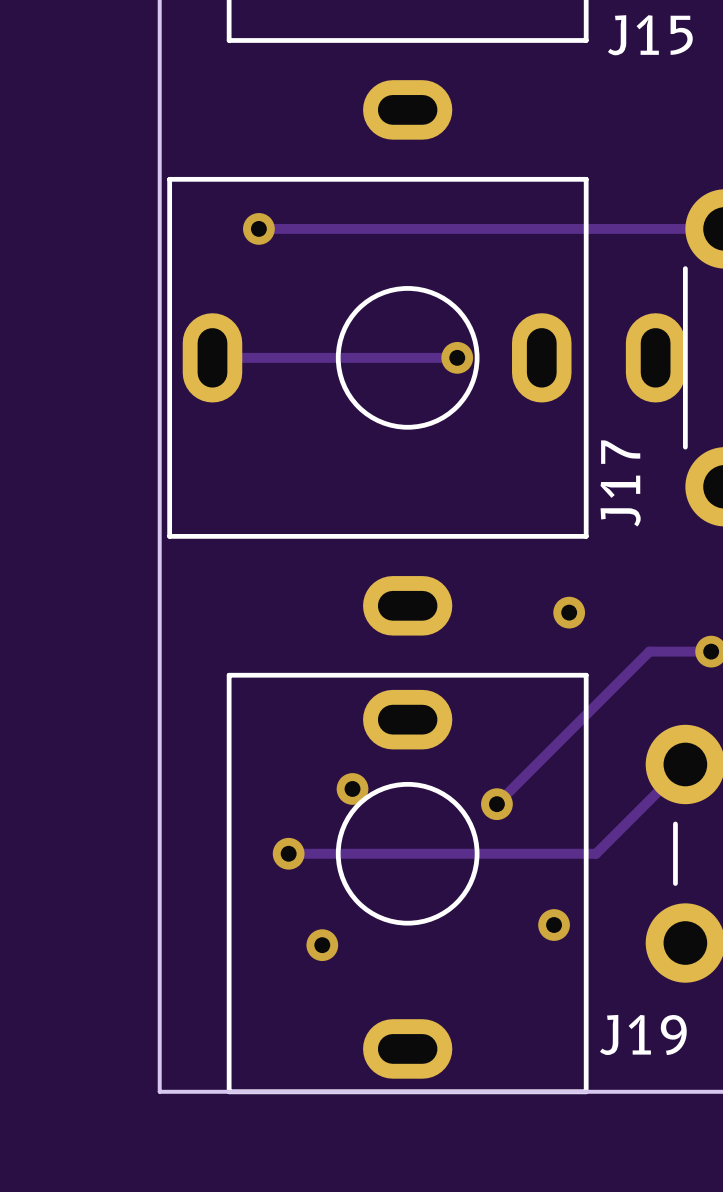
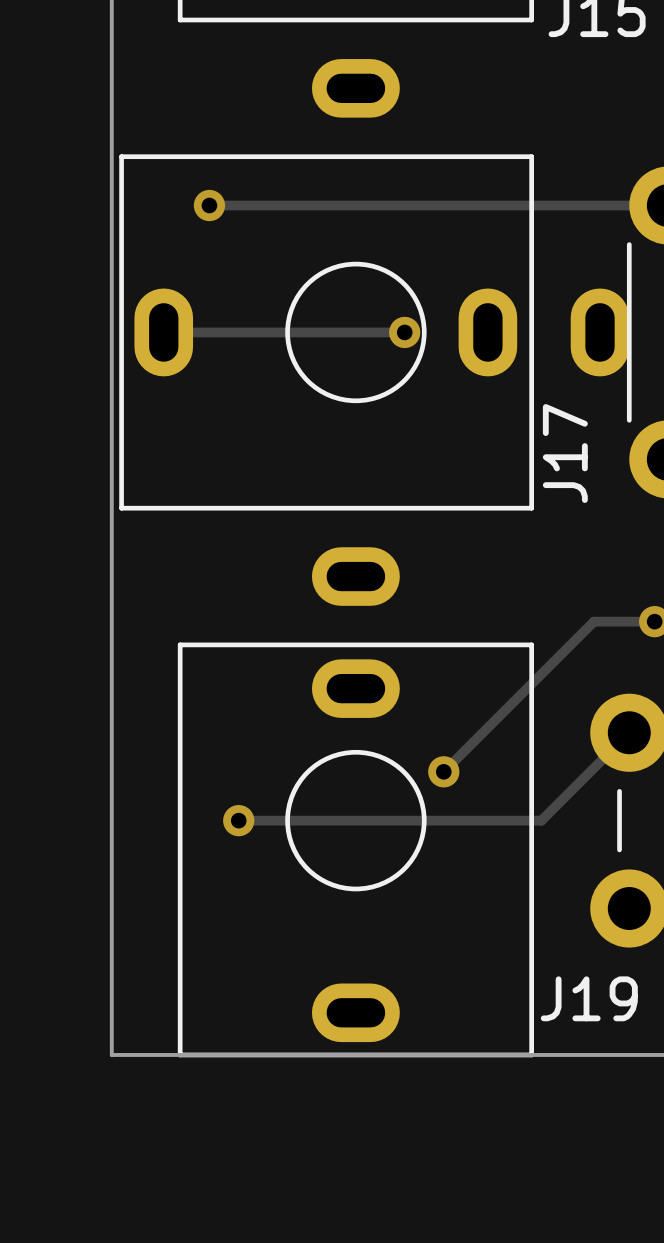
via: (569, 612) -> none
via: (352, 788) -> none
via: (554, 925) -> none
via: (322, 945) -> none

